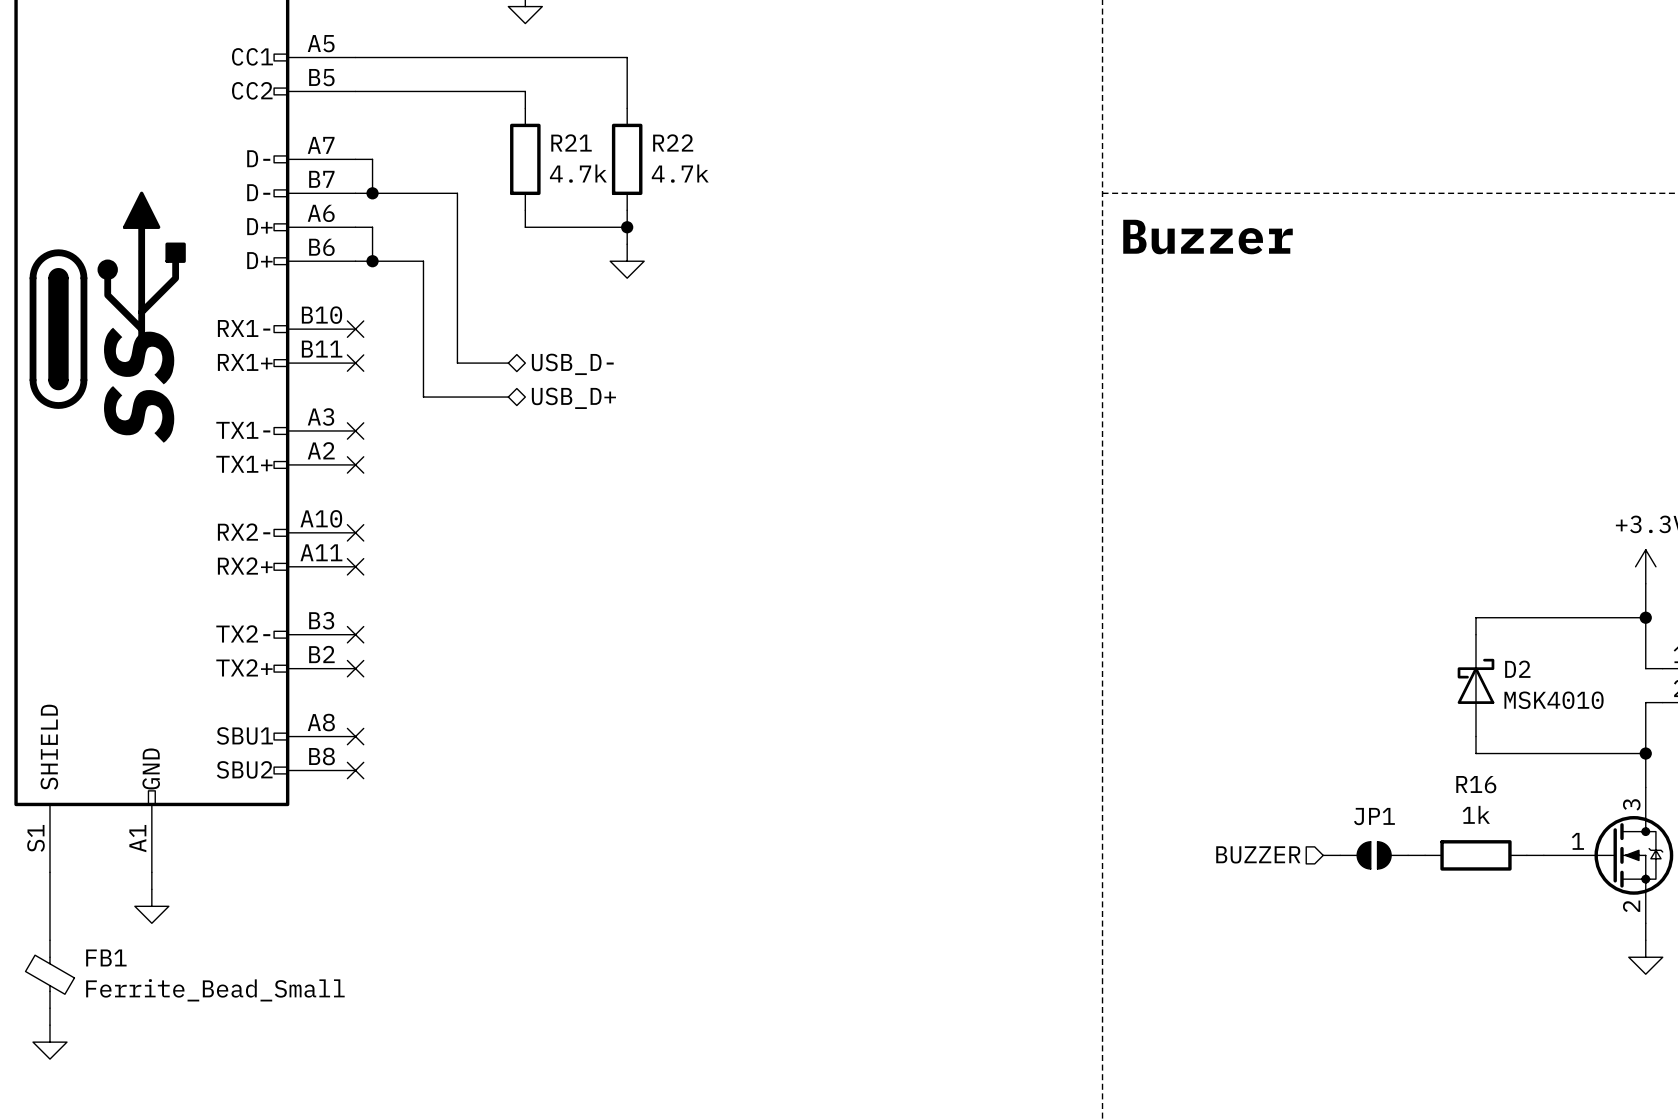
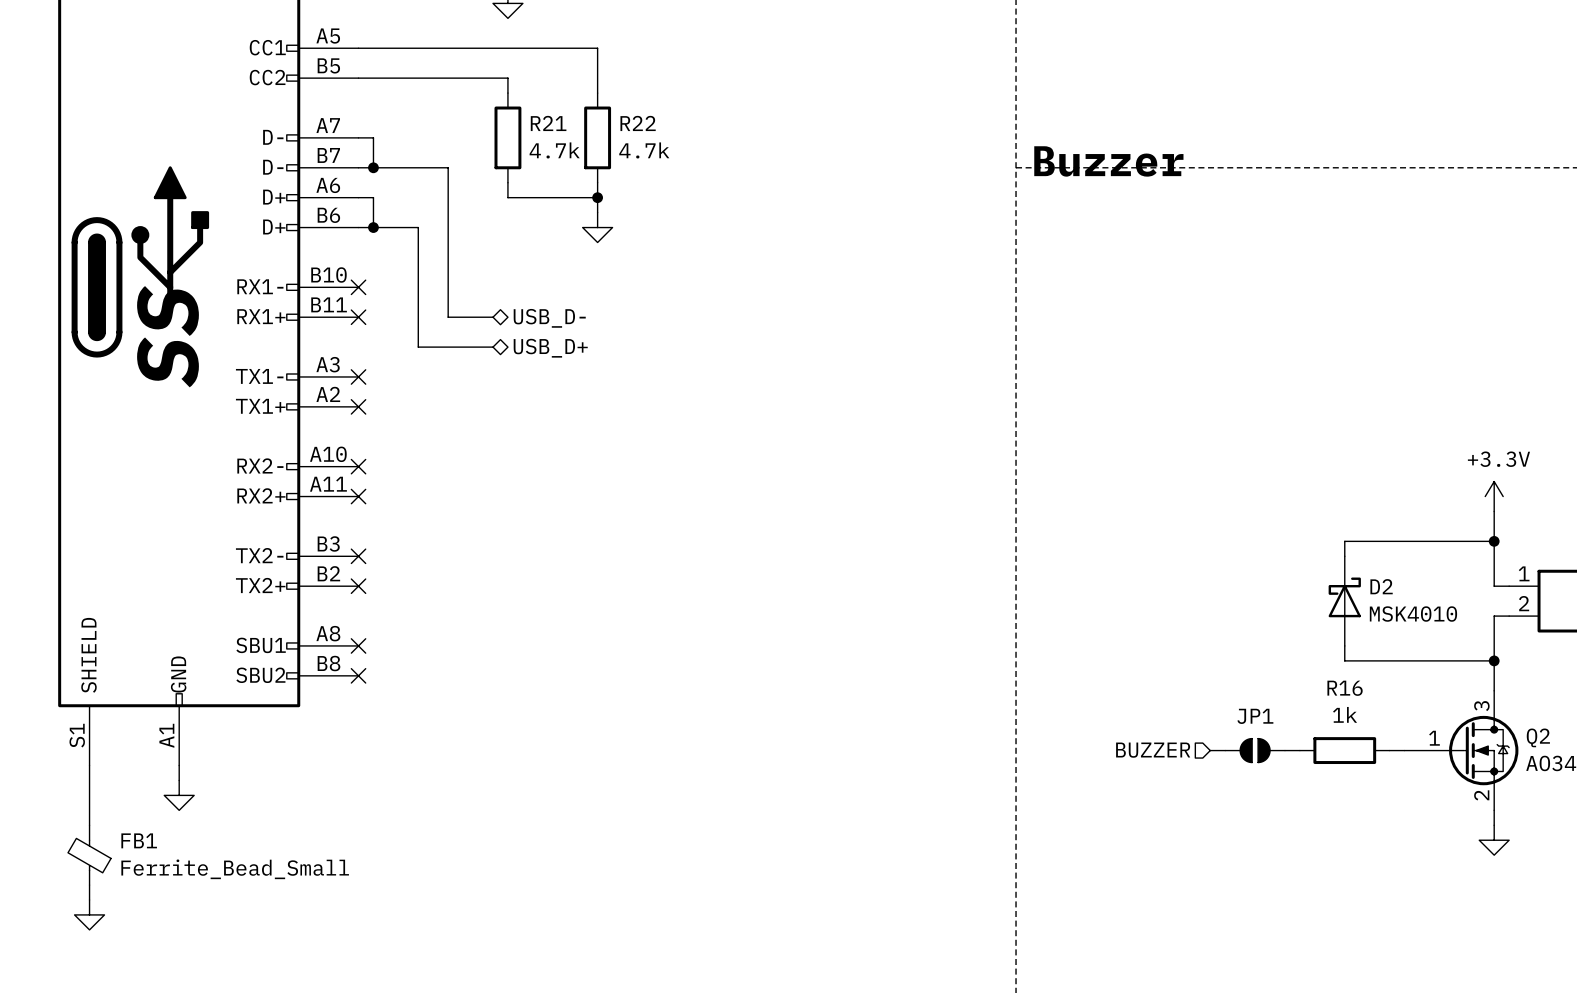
text position: Buzzer (1208, 237) -> Buzzer (1108, 161)

